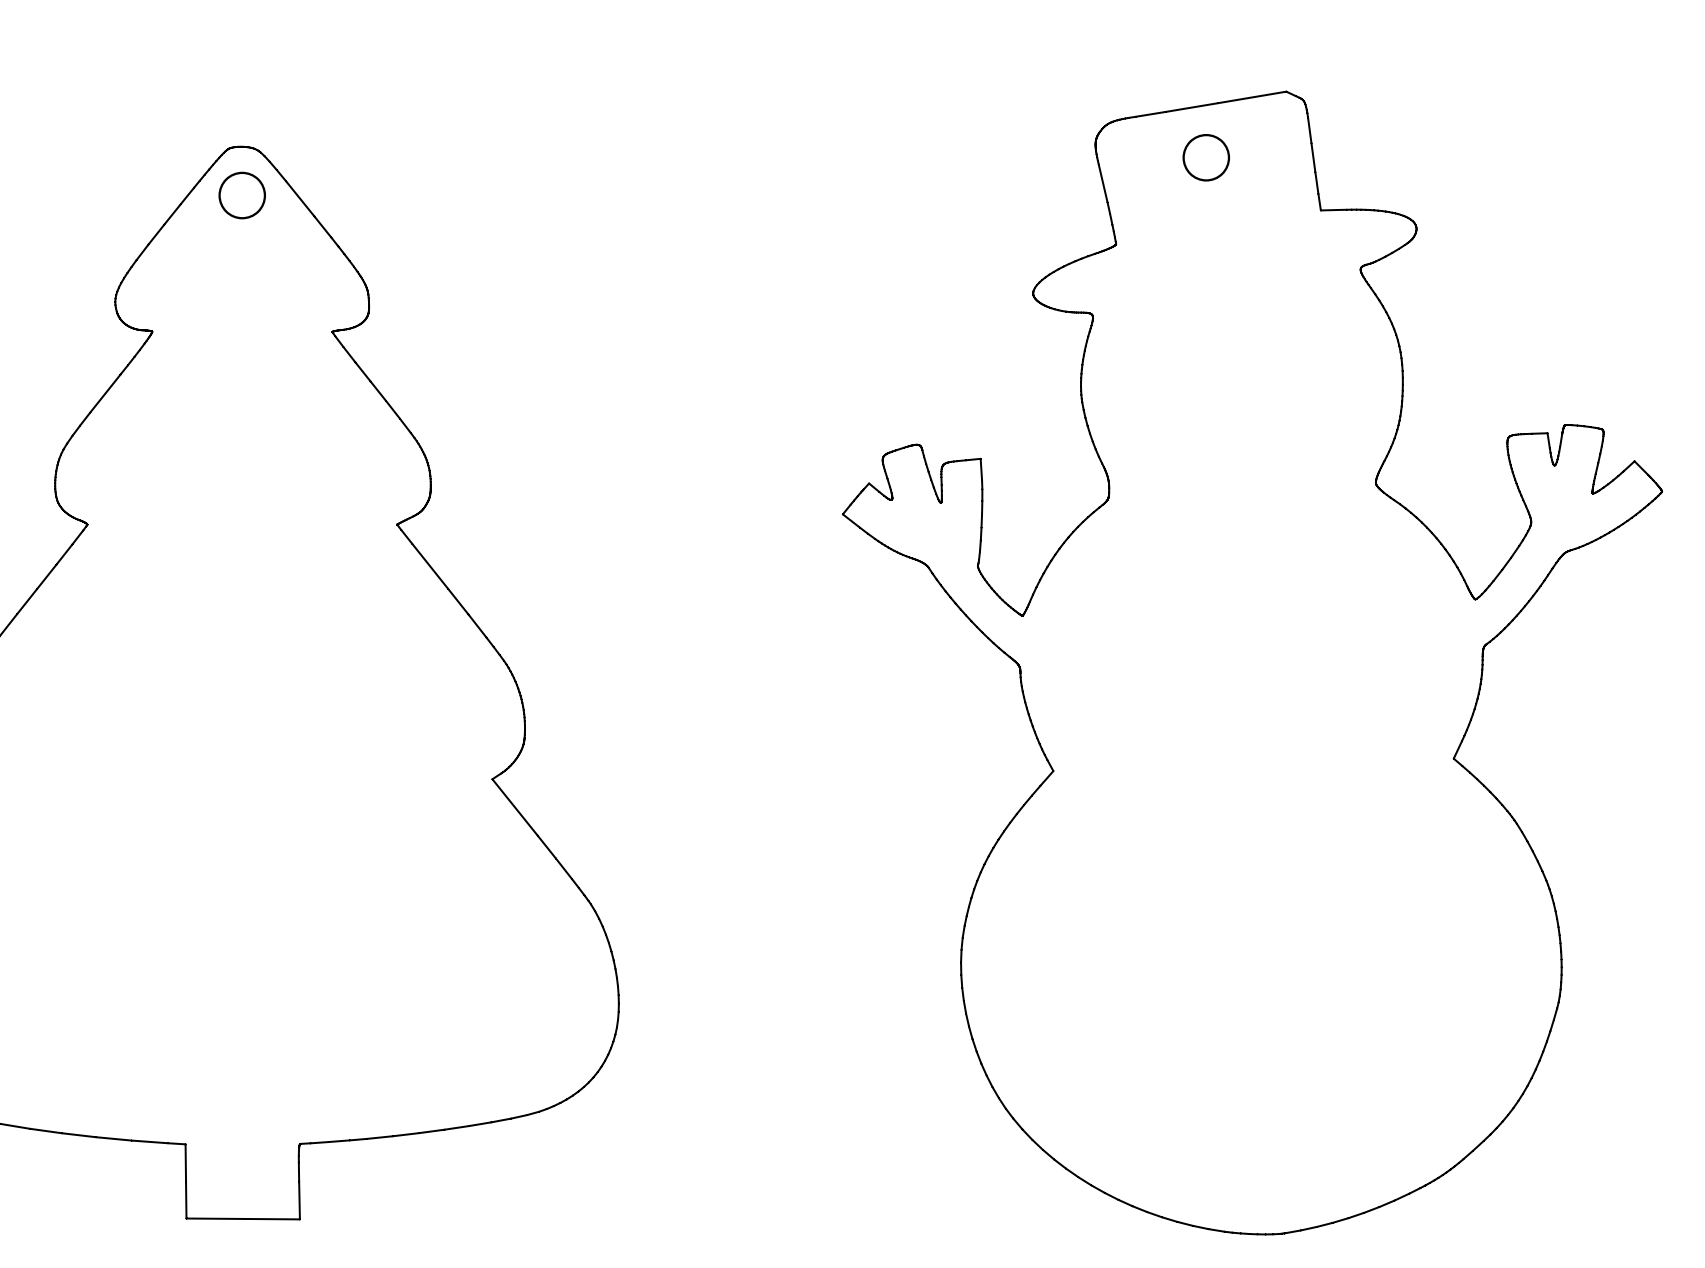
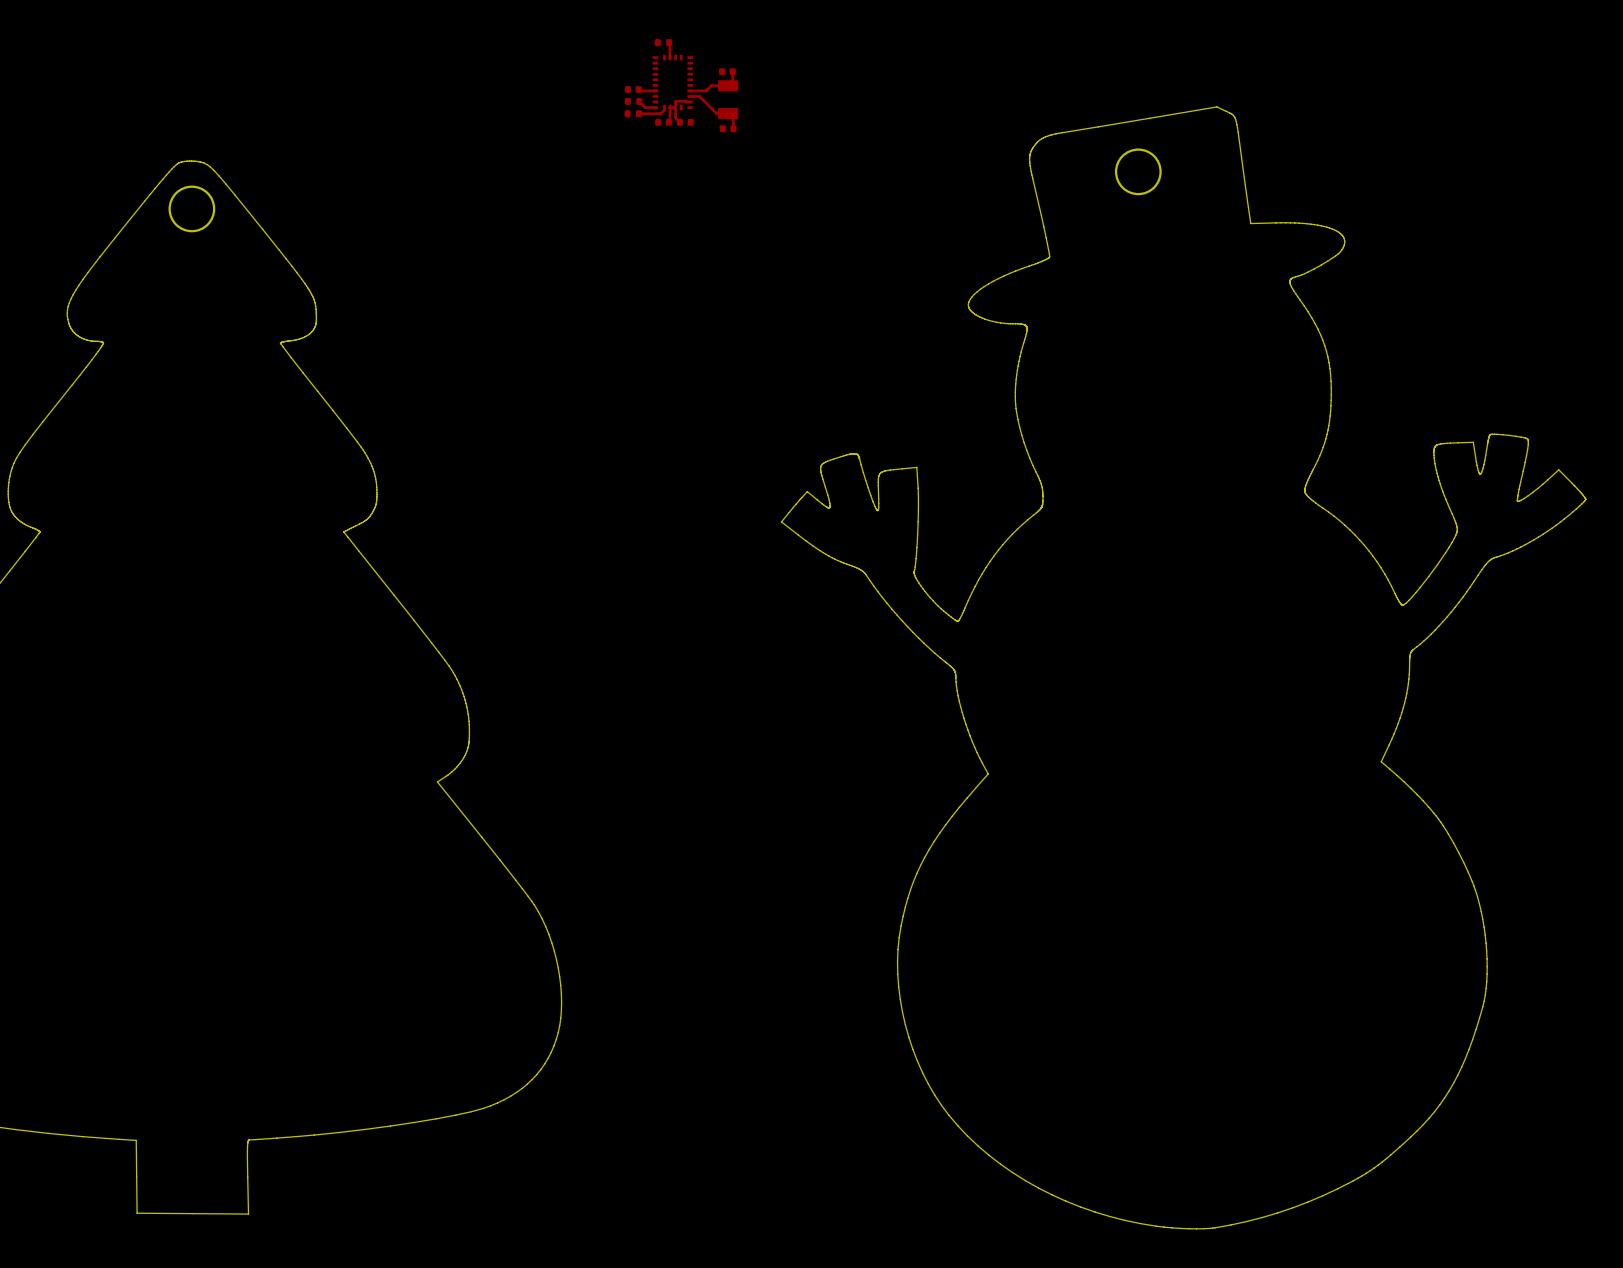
part: none -> (663, 42)
top track: none -> (669, 42) (670, 57)
part: none -> (727, 71)
top track: none -> (732, 71) (732, 81) (728, 85) (711, 85) (706, 90) (690, 90)
part: none -> (672, 82)
part: none -> (633, 89)
top track: none -> (638, 89) (655, 90)
top track: none -> (690, 96) (699, 96) (716, 113) (728, 113) (733, 118) (733, 128)
part: none -> (728, 99)
part: none -> (633, 101)
top track: none -> (639, 101) (645, 107) (655, 107)
top track: none -> (690, 102) (675, 102) (675, 117) (680, 122)
top track: none -> (664, 107) (660, 113) (638, 113)
top track: none -> (675, 107) (670, 107) (668, 122)
part: none -> (633, 113)
part: none -> (663, 122)
part: none -> (685, 122)
part: none -> (728, 128)

